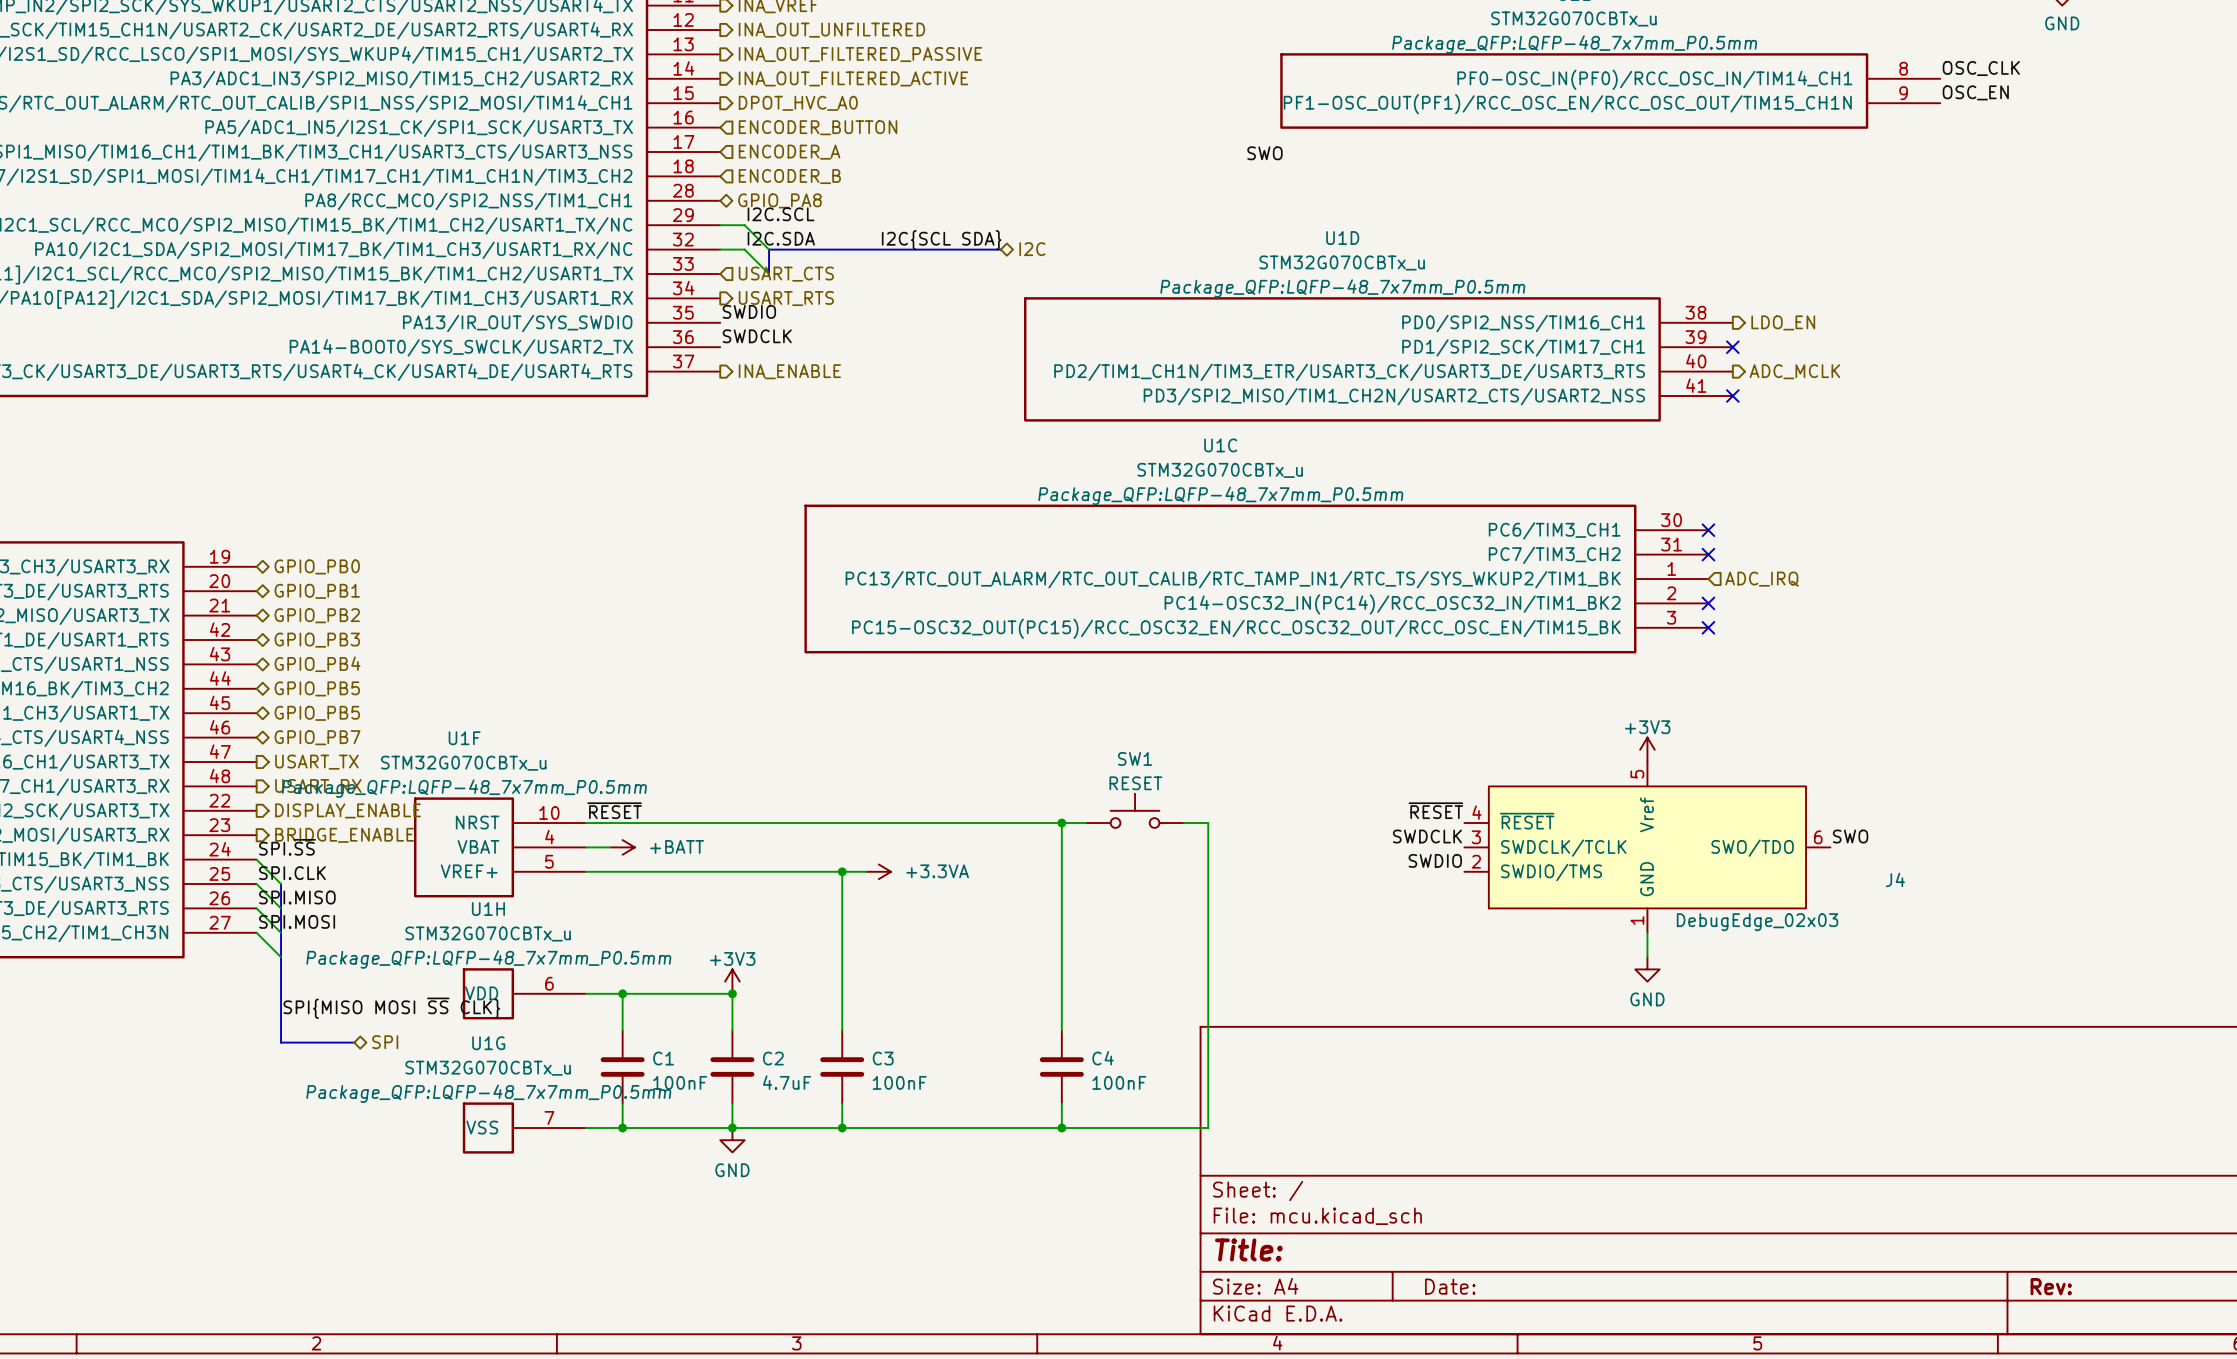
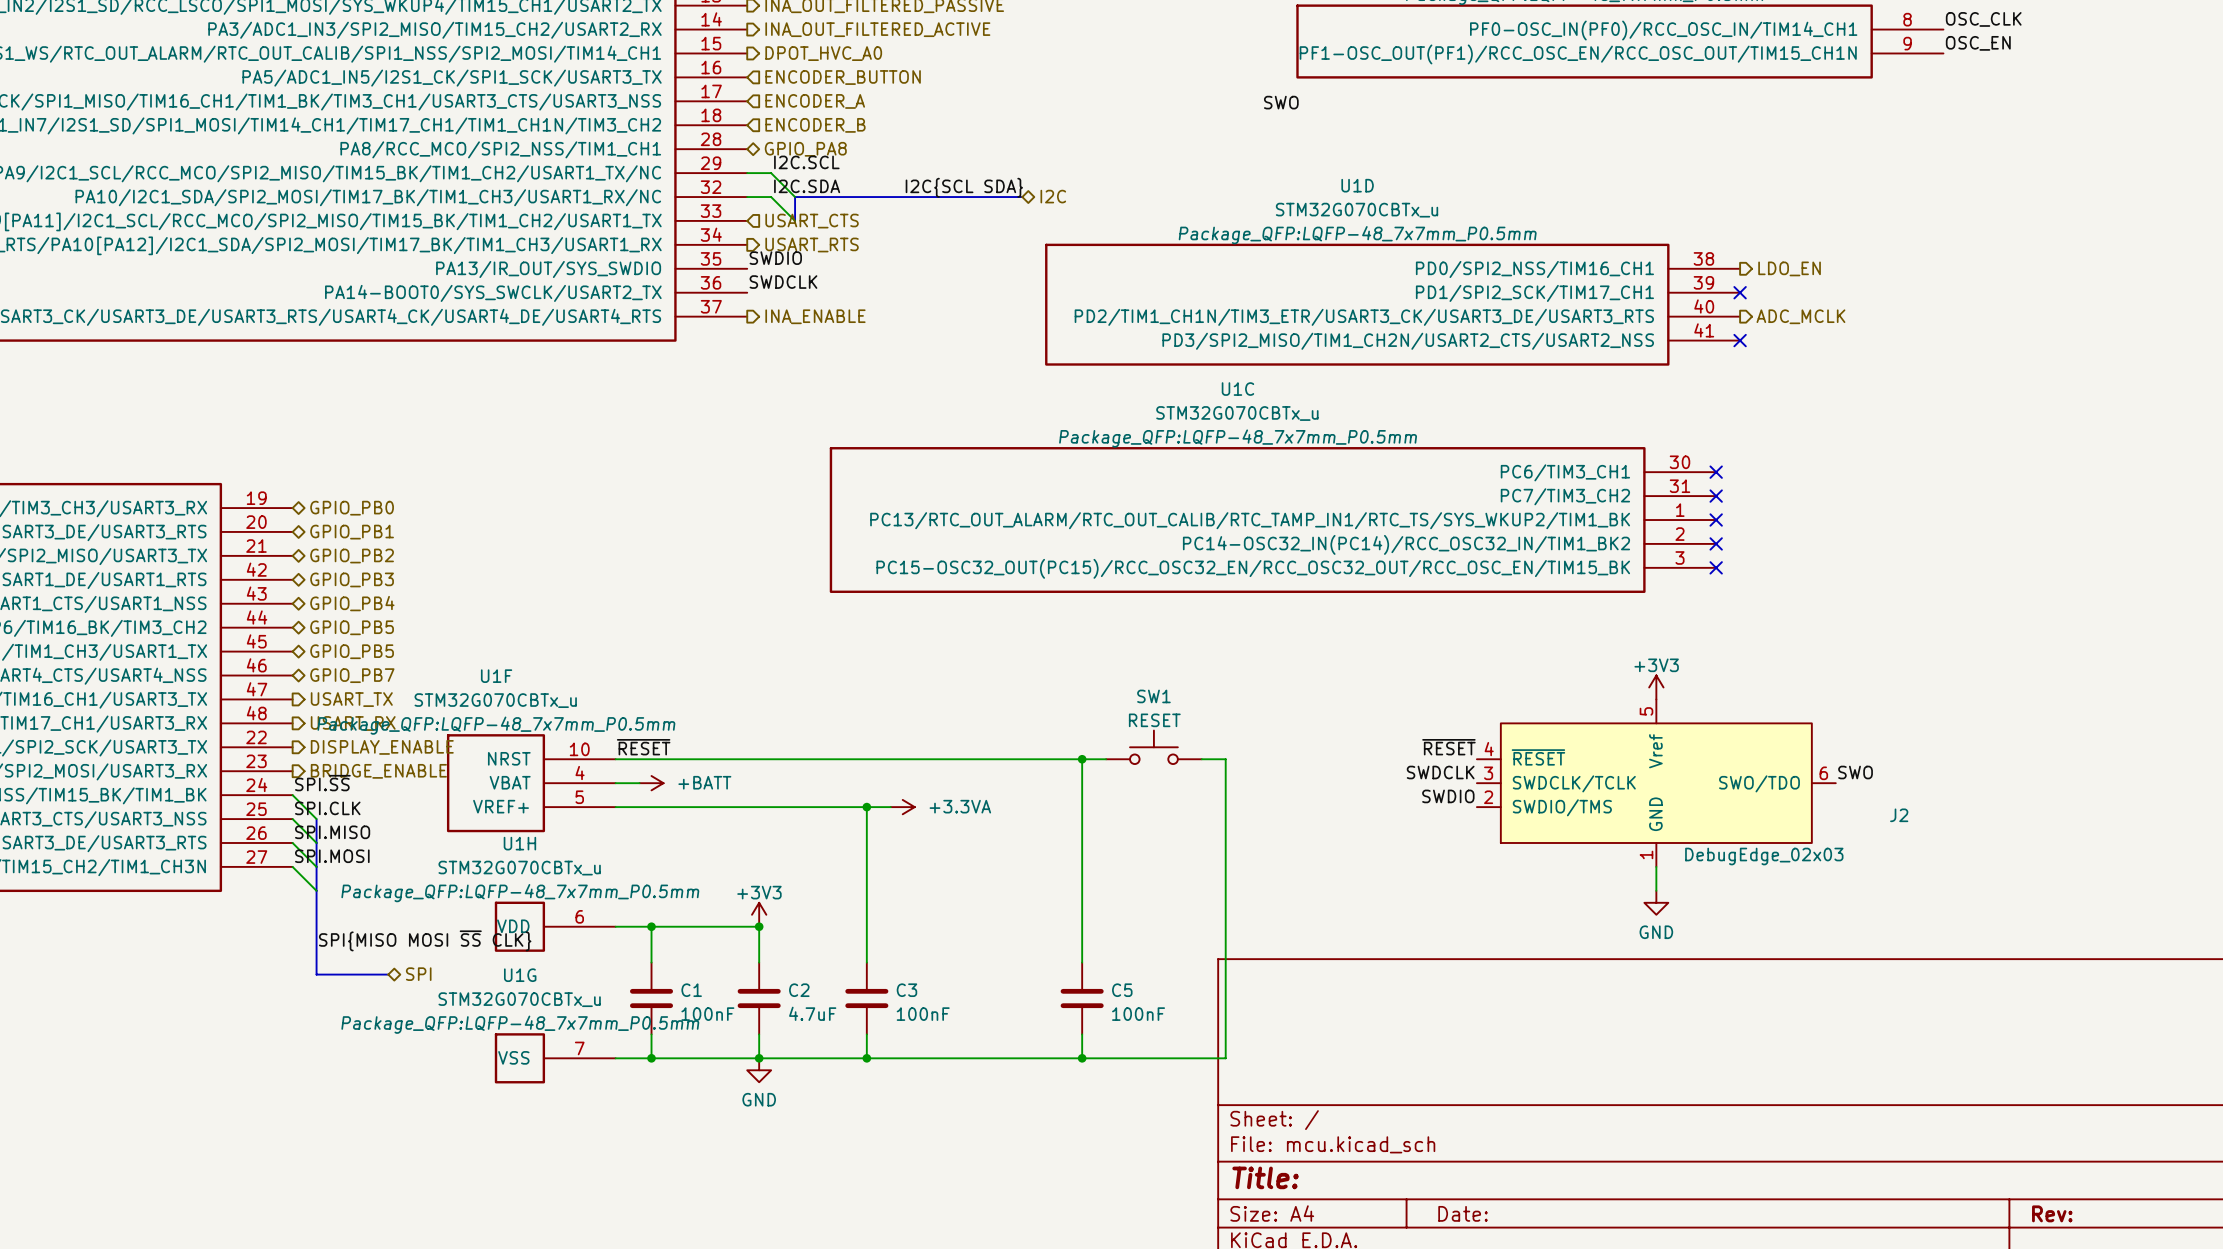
no-connect mark: none -> (1716, 520)
hierarchical label: ADC_IRQ (1762, 579) -> none
J4 name: J4 (1895, 879) -> J2 (1899, 815)
C4 name: C4 (1103, 1058) -> C5 (1122, 990)

